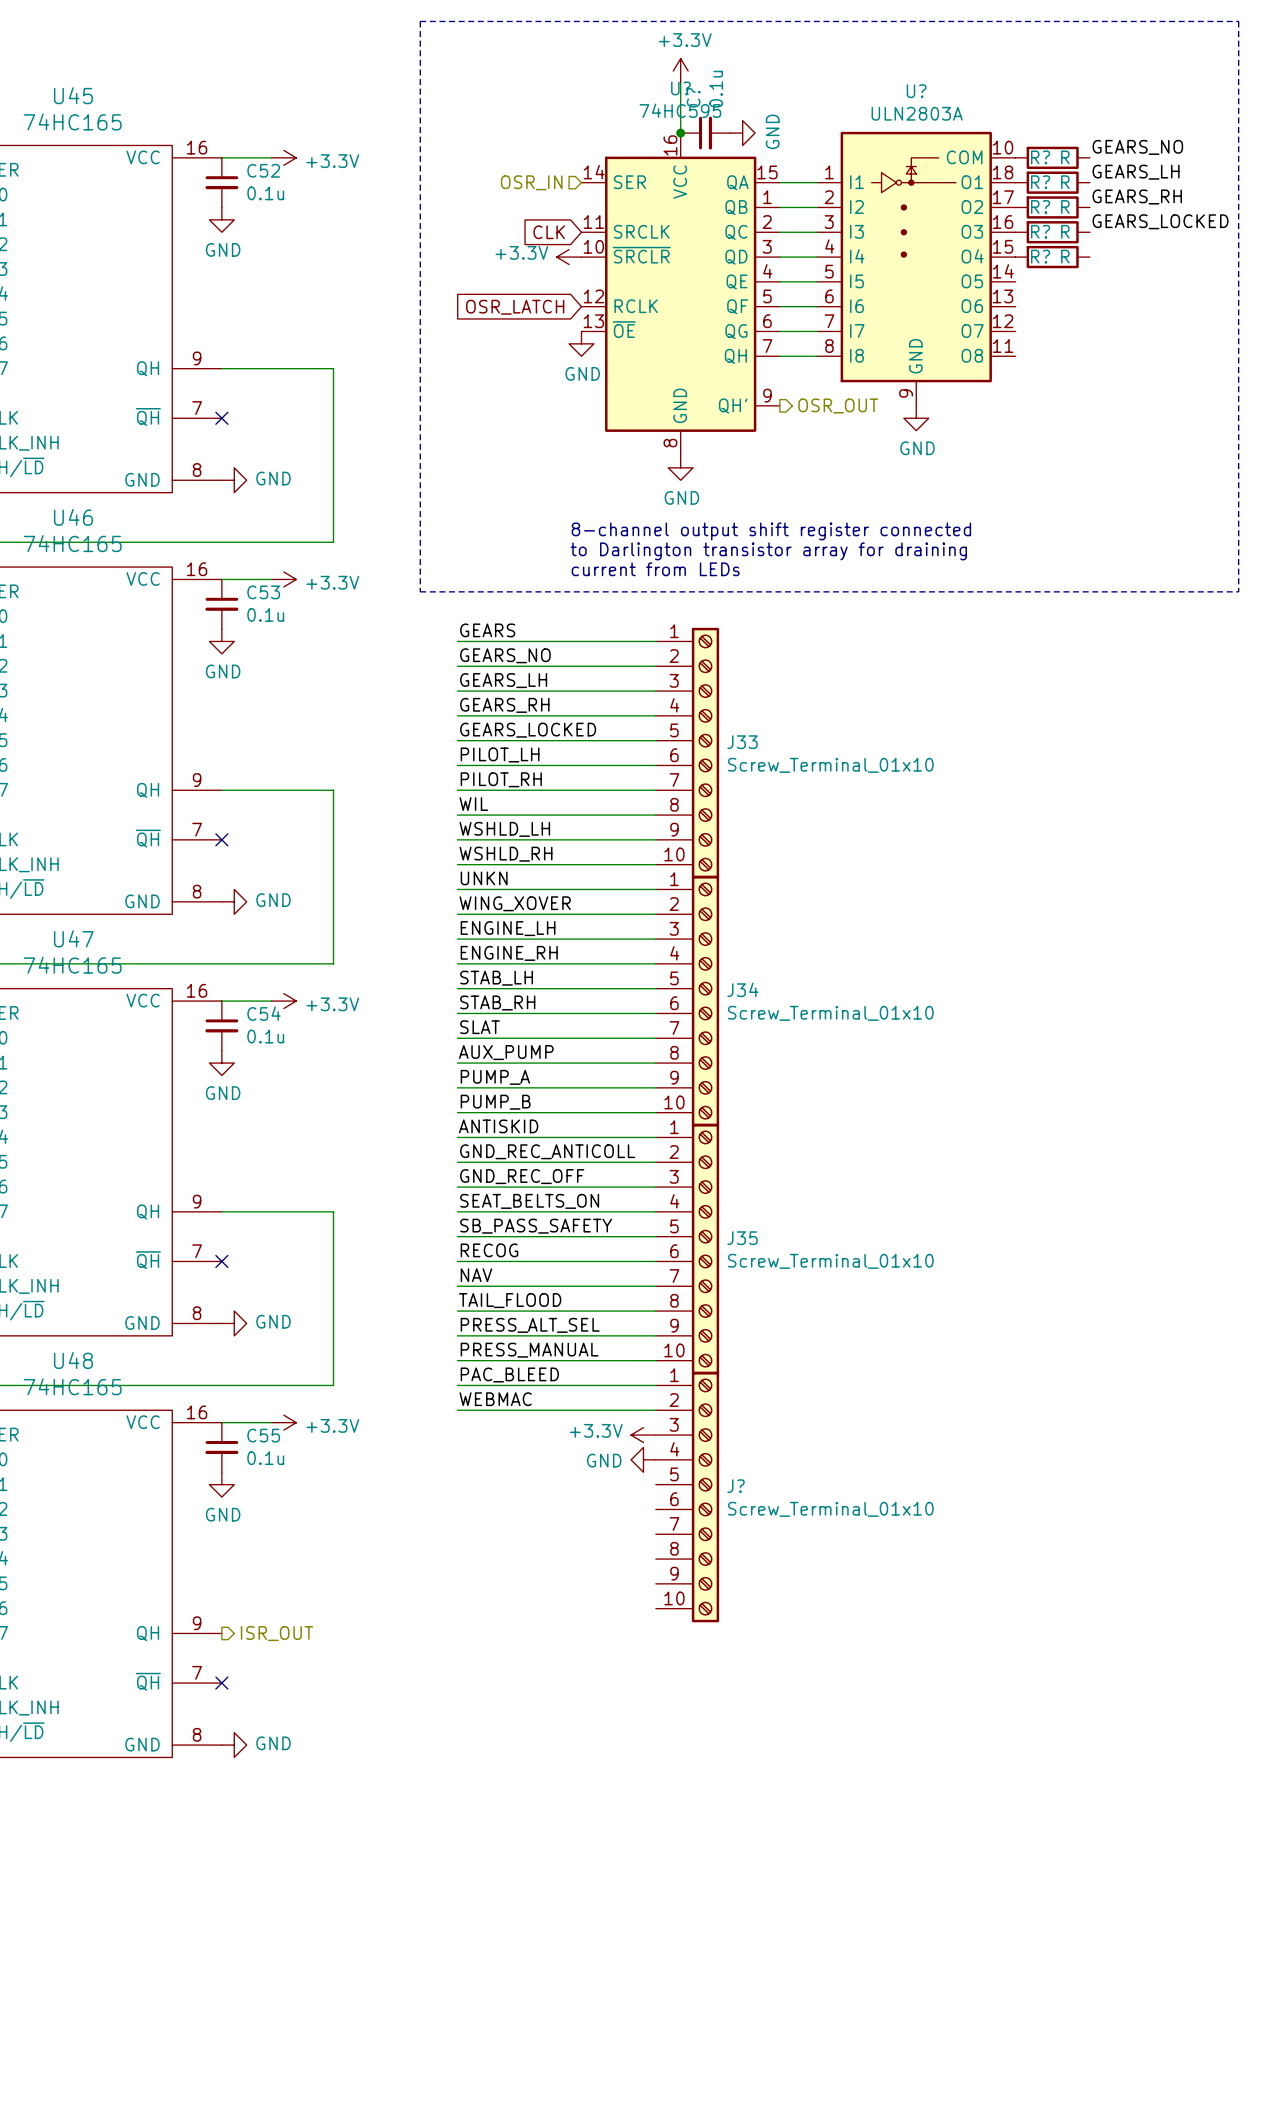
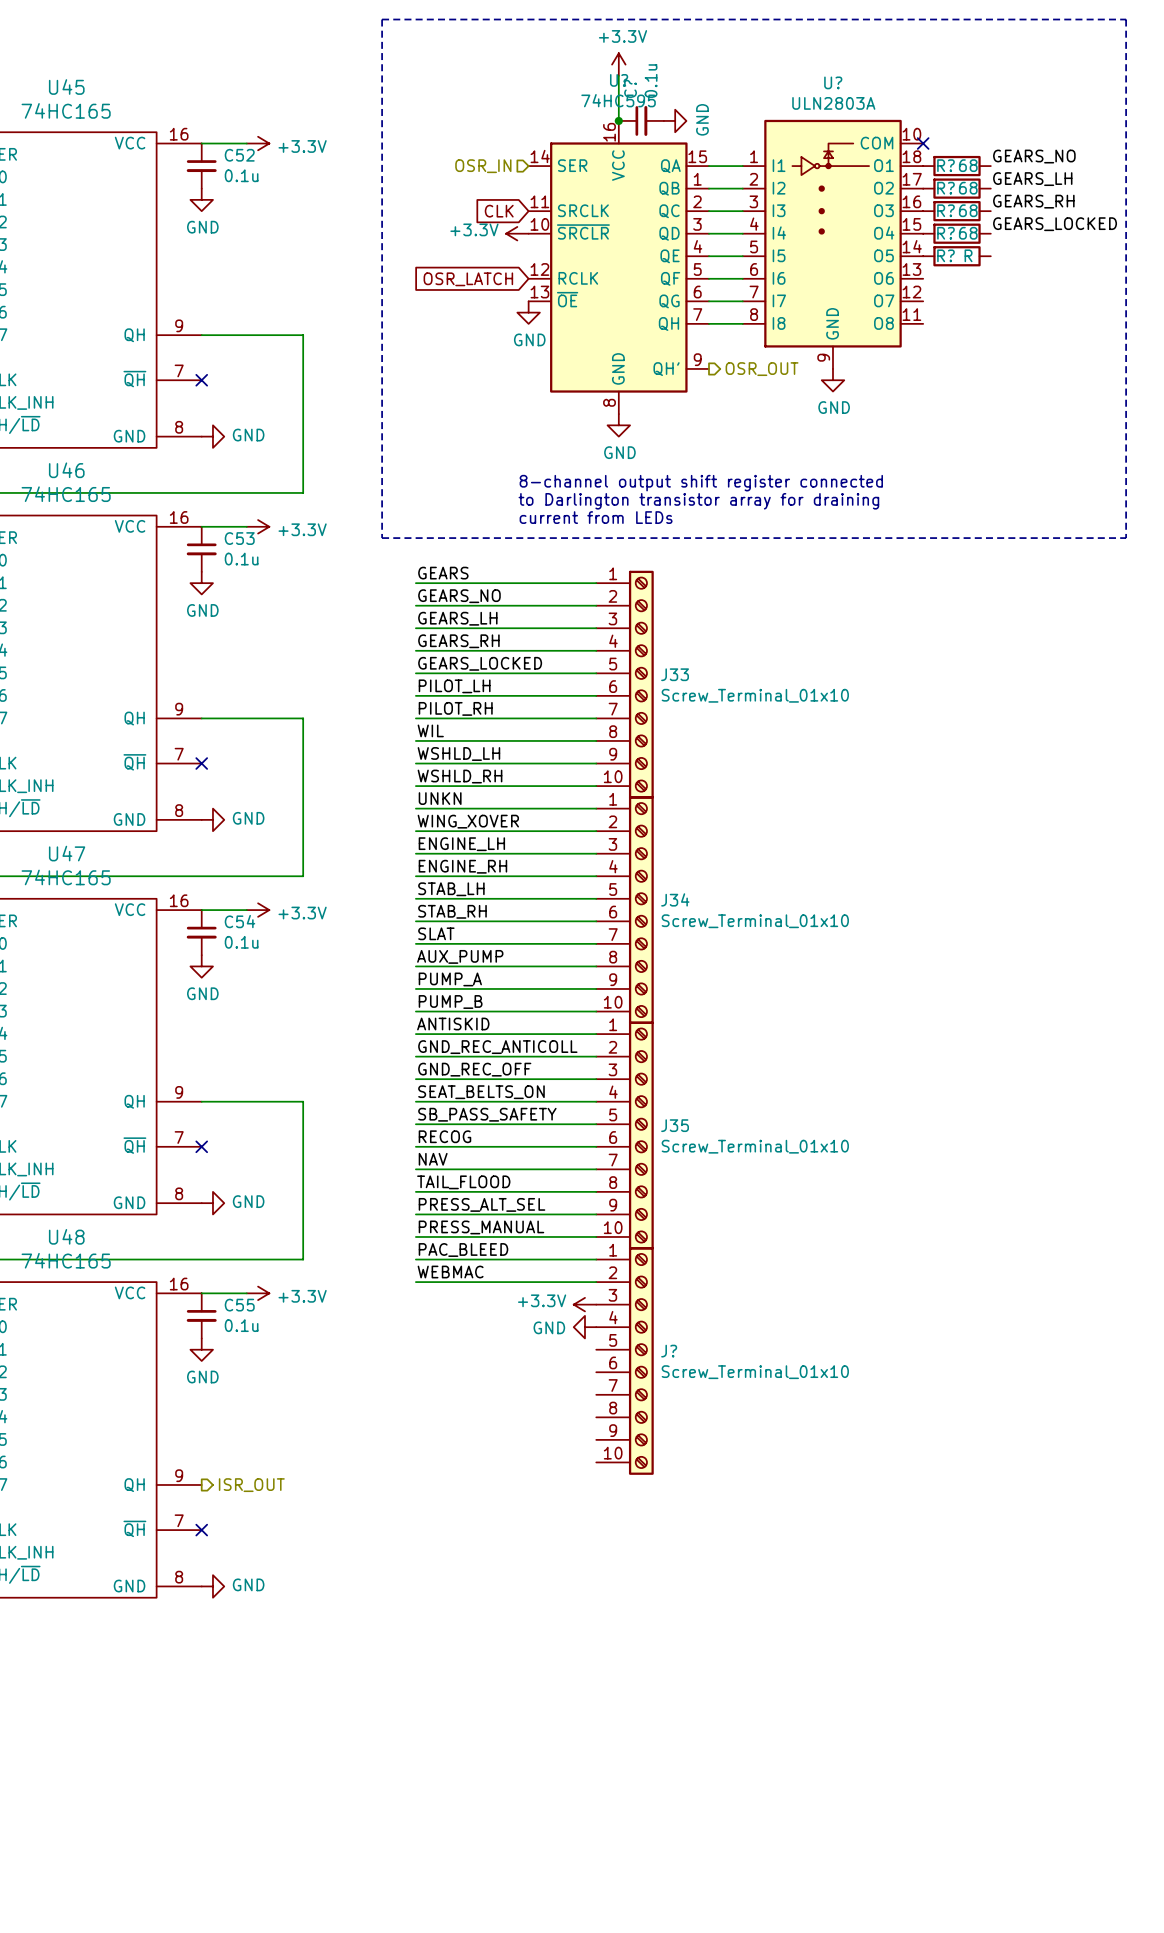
label: GEARS_NO (1137, 147) -> none
no-connect mark: none -> (923, 143)
R? position: (1052, 157) -> (957, 256)
label: GEARS_LH (1136, 172) -> GEARS_NO (1034, 156)
R? value: R (1065, 182) -> 68 (968, 165)
label: GEARS_RH (1137, 196) -> GEARS_LH (1032, 179)
R? value: R (1065, 207) -> 68 (968, 188)
label: GEARS_LOCKED (1160, 221) -> GEARS_RH (1033, 201)
R? value: R (1065, 231) -> 68 (968, 210)
label: none -> GEARS_LOCKED (1055, 224)
R? value: R (1065, 256) -> 68 (968, 233)

